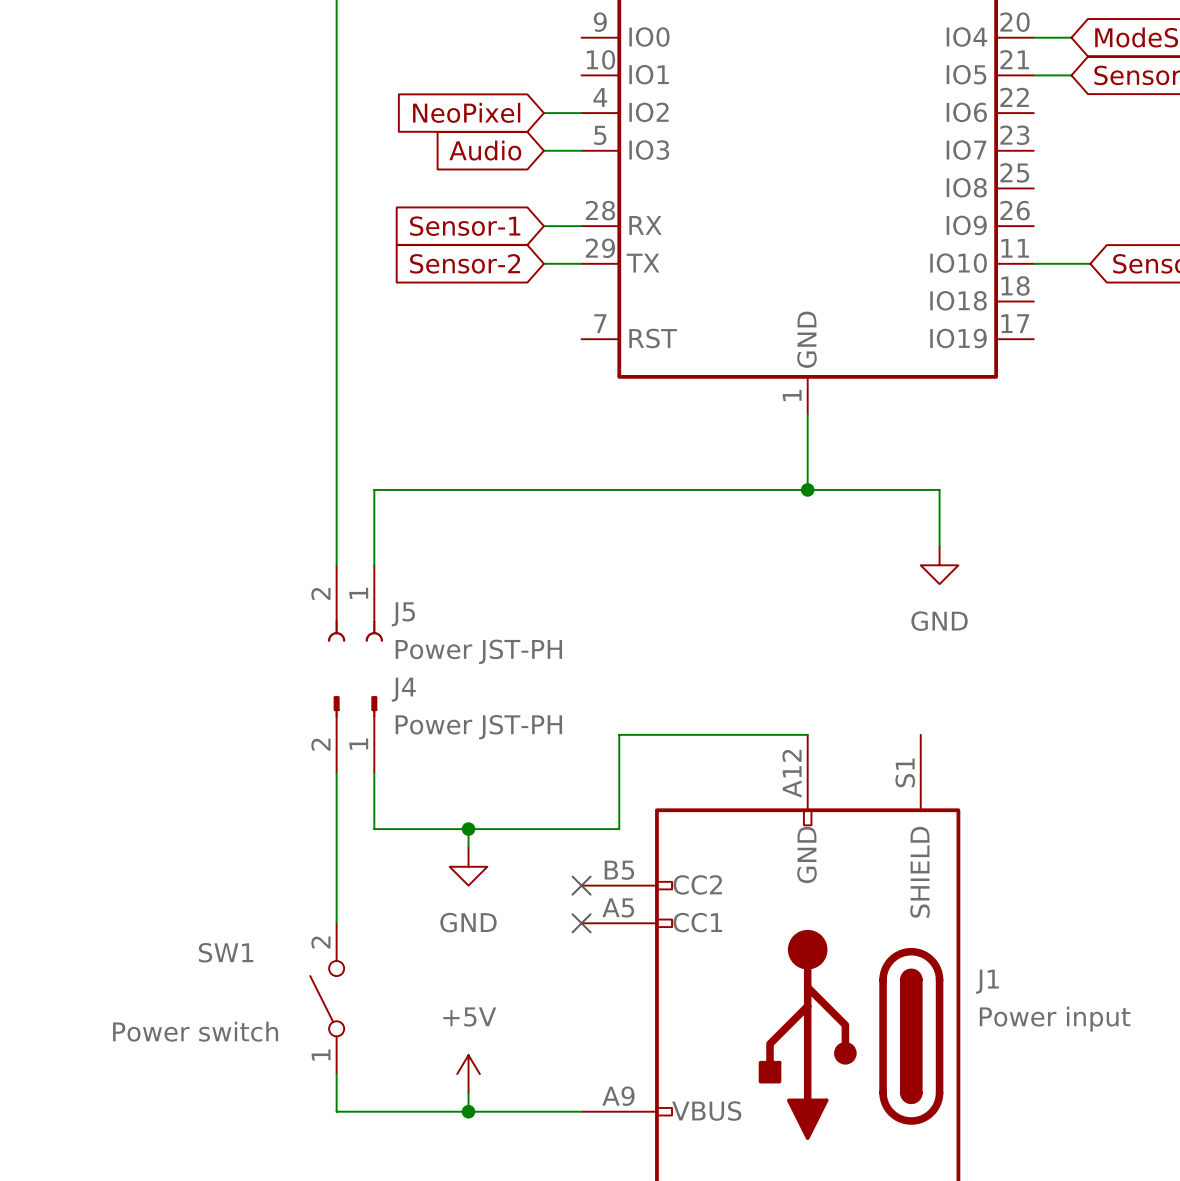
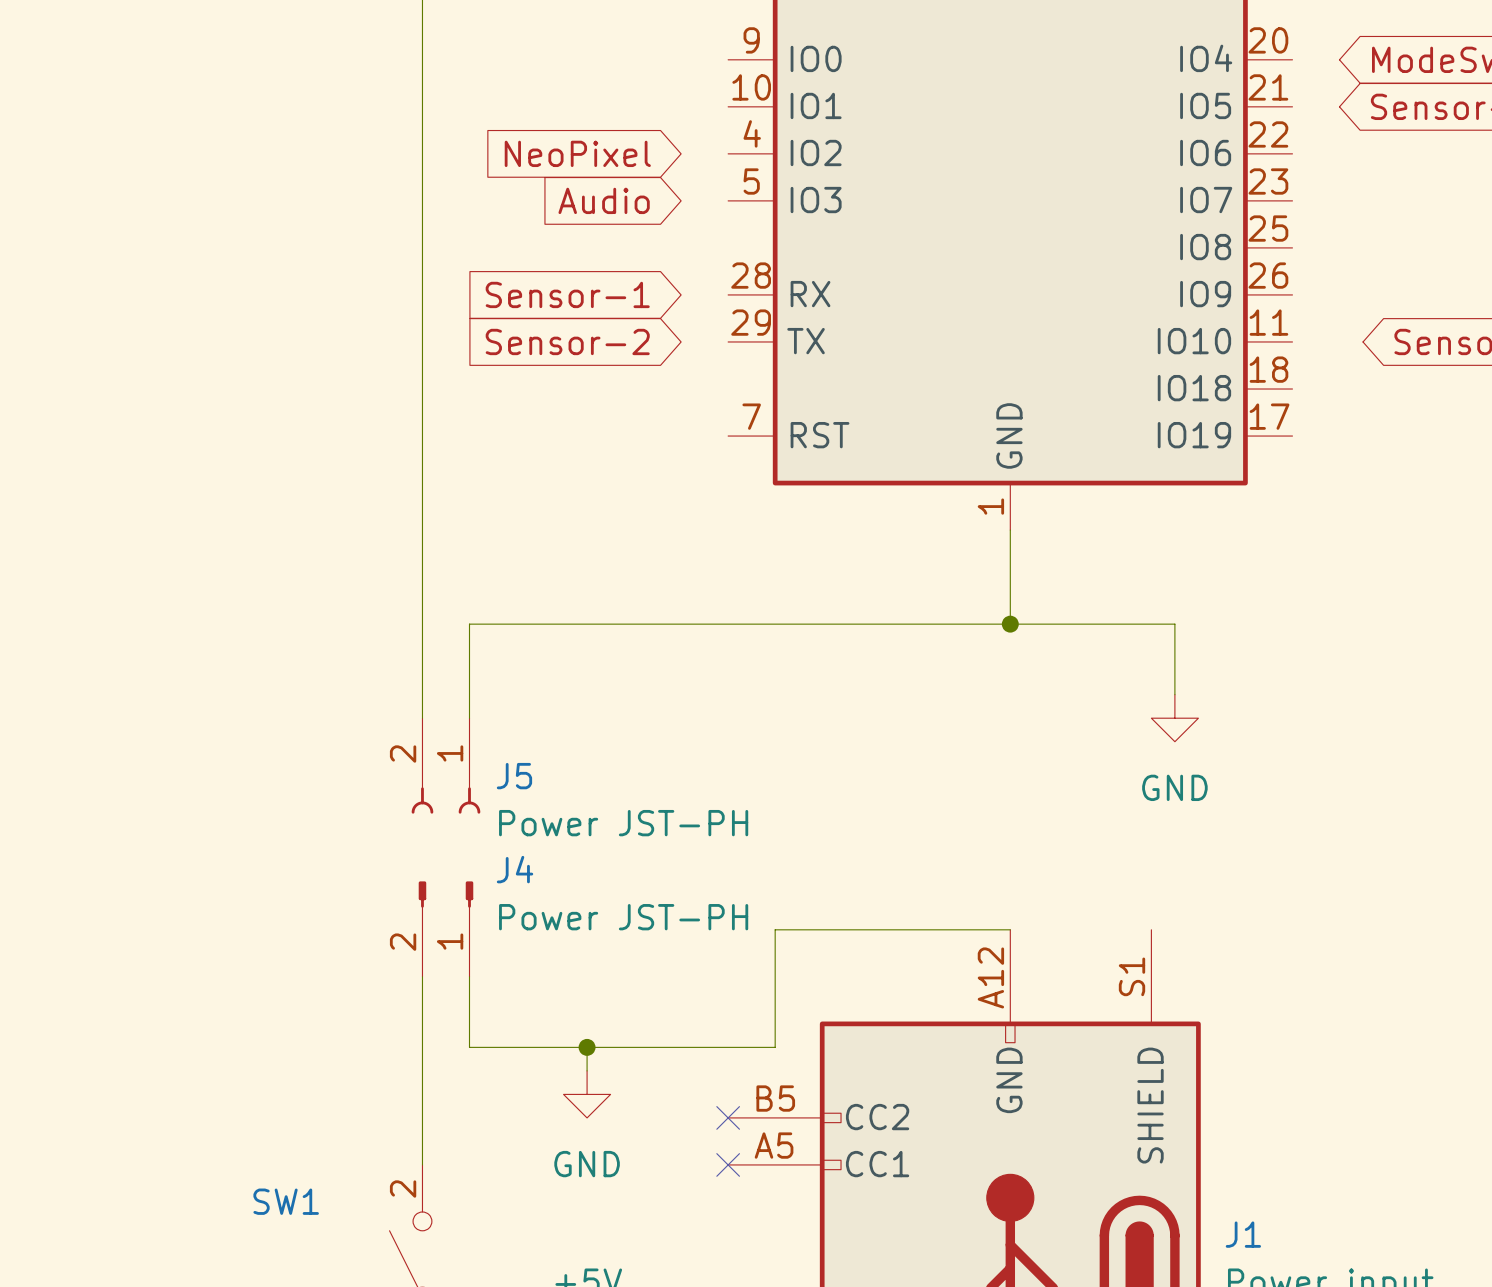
wire: (1033, 37) (1071, 37) -> none
wire: (1033, 75) (1071, 75) -> none
wire: (543, 113) (581, 113) -> none
wire: (543, 150) (581, 150) -> none
wire: (543, 226) (581, 226) -> none
wire: (543, 263) (581, 263) -> none
wire: (1033, 263) (1090, 263) -> none

